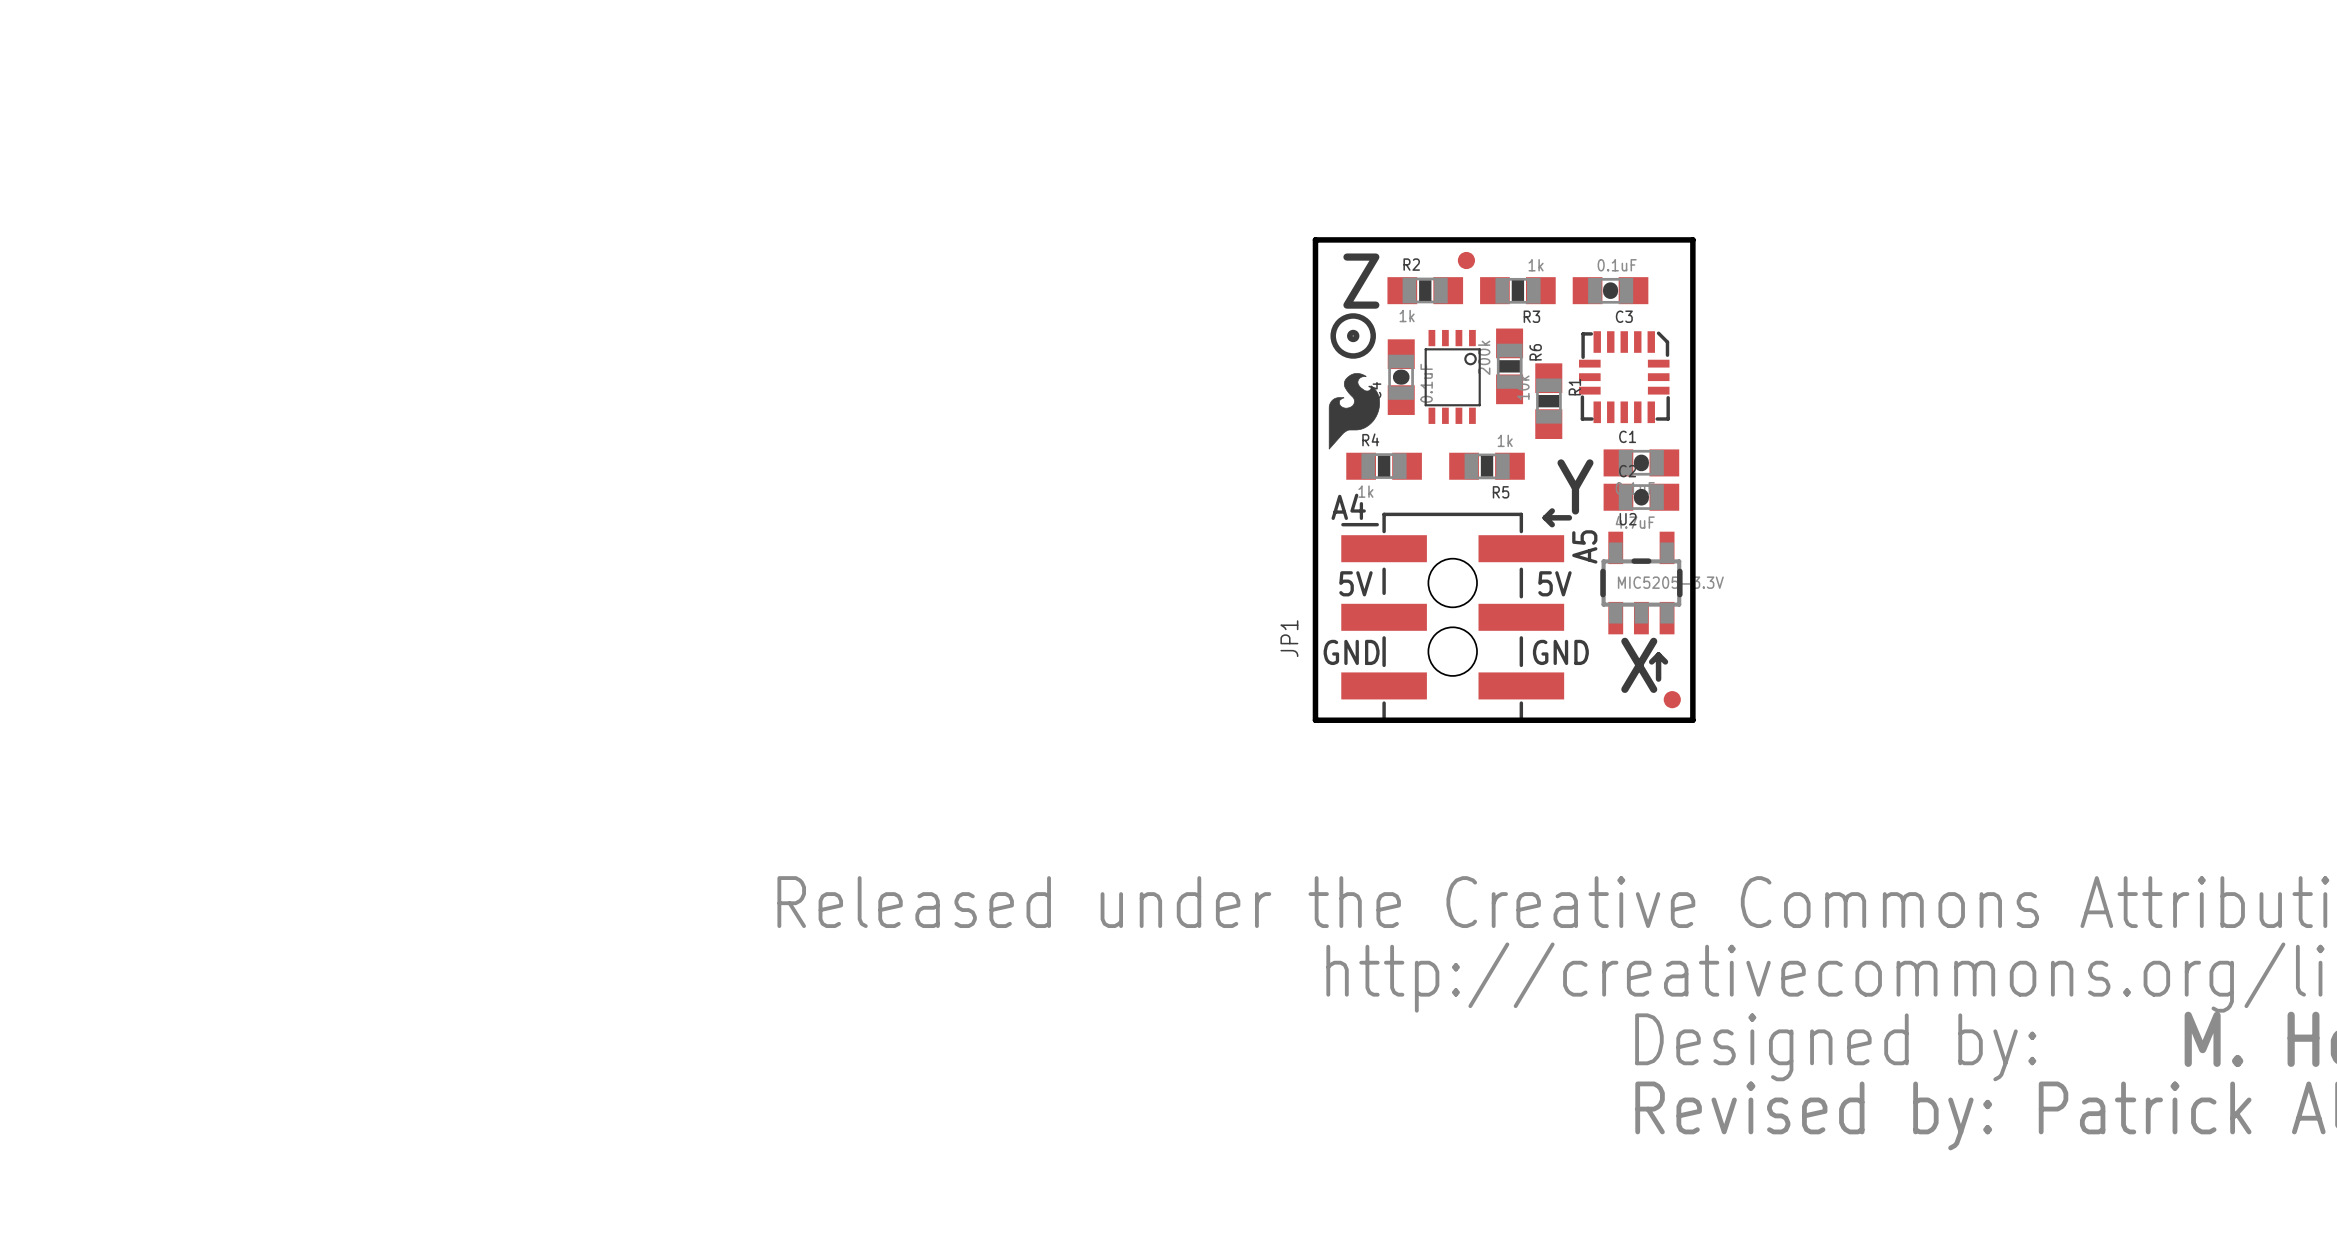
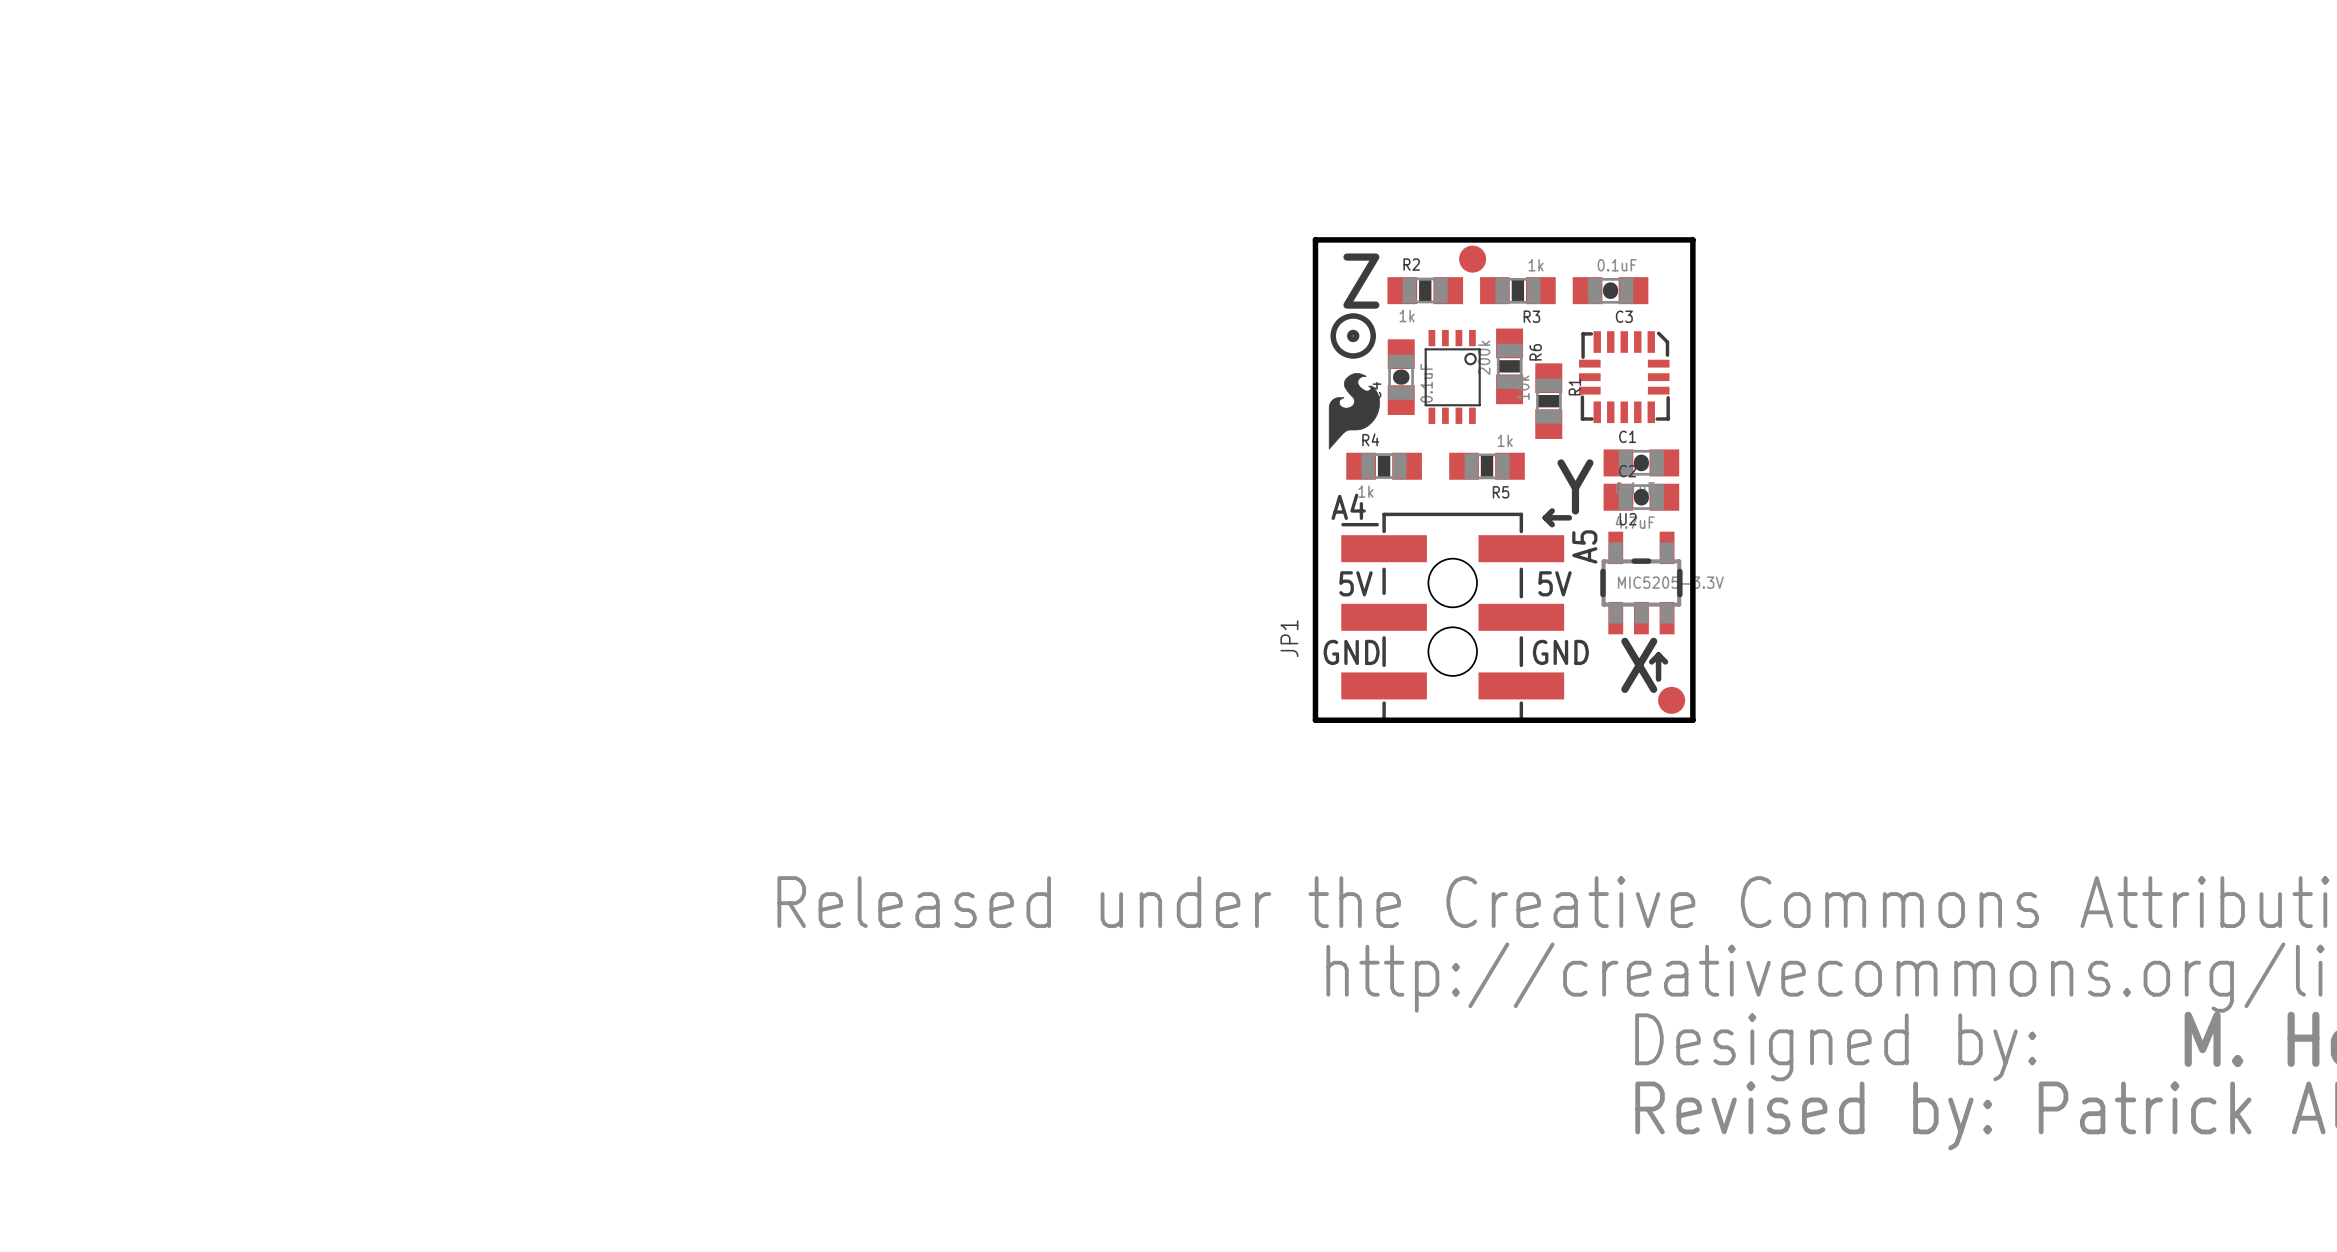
part footprint: [1457, 251, 1476, 270] -> [1459, 245, 1487, 273]
part footprint: [1663, 691, 1681, 709] -> [1658, 686, 1686, 714]

